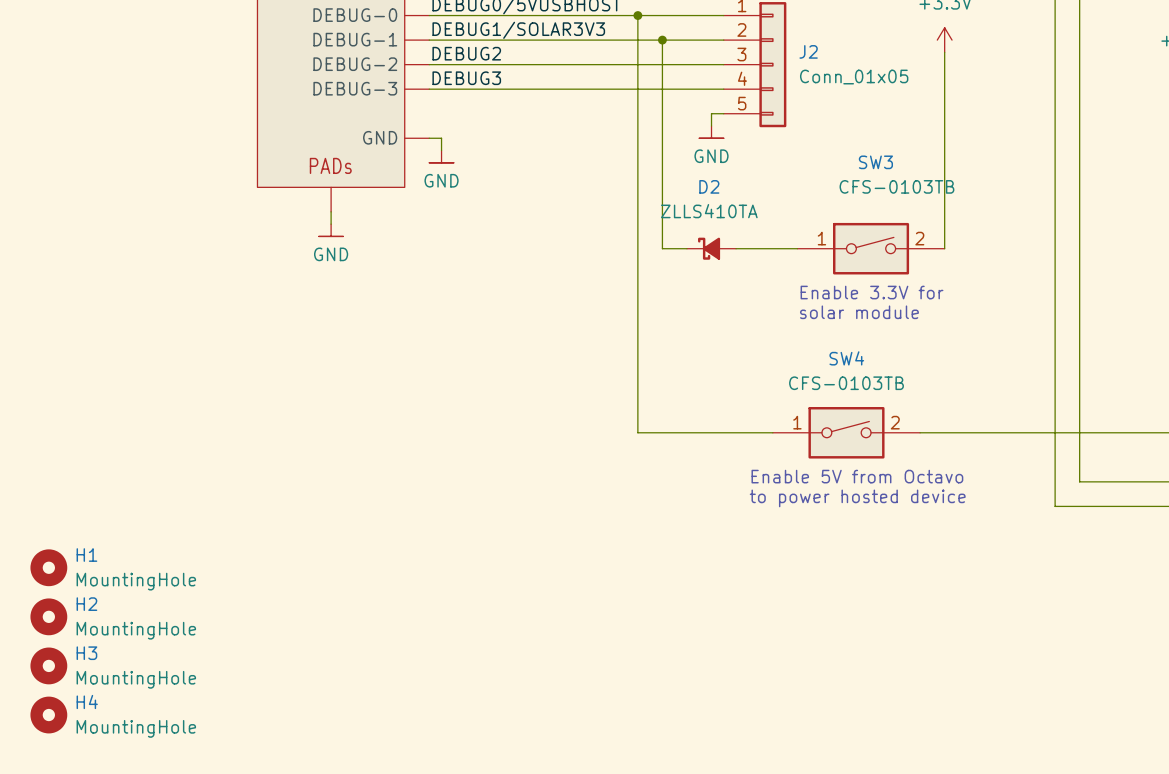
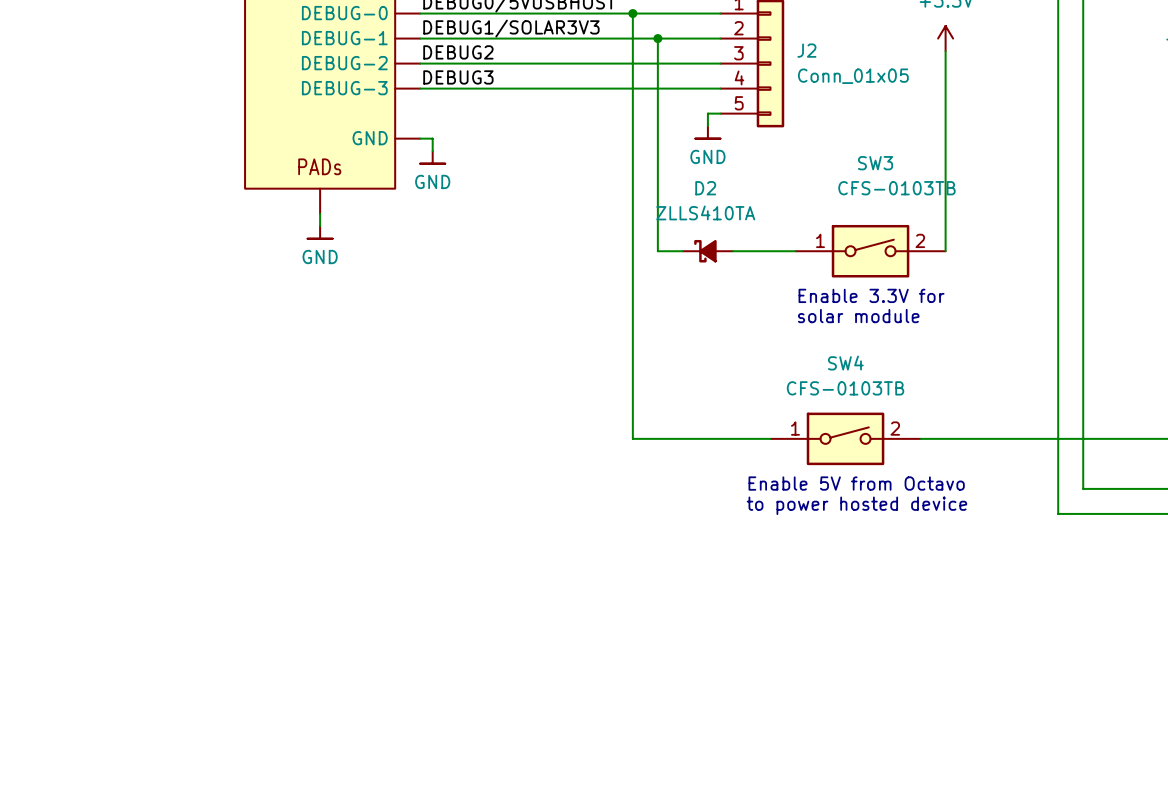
H1: MountingHole (48, 567) -> none
H2: MountingHole (48, 616) -> none
H3: MountingHole (48, 665) -> none
H4: MountingHole (48, 715) -> none

